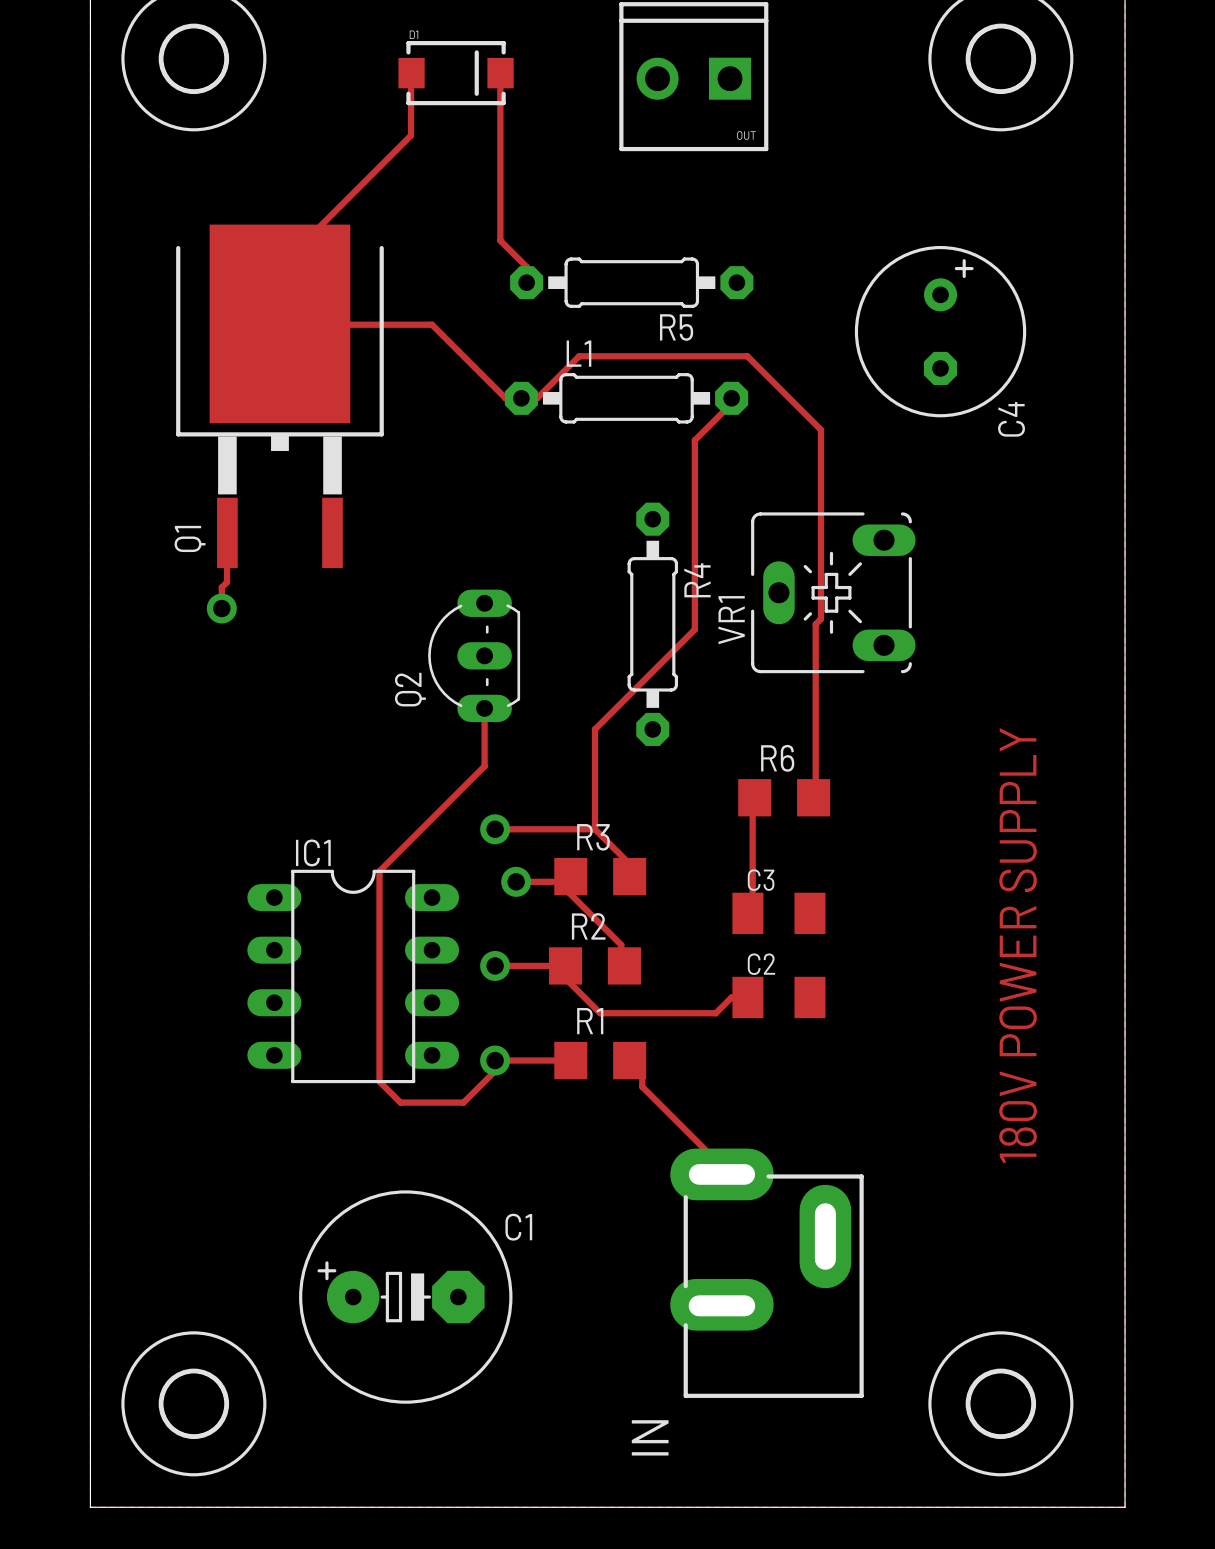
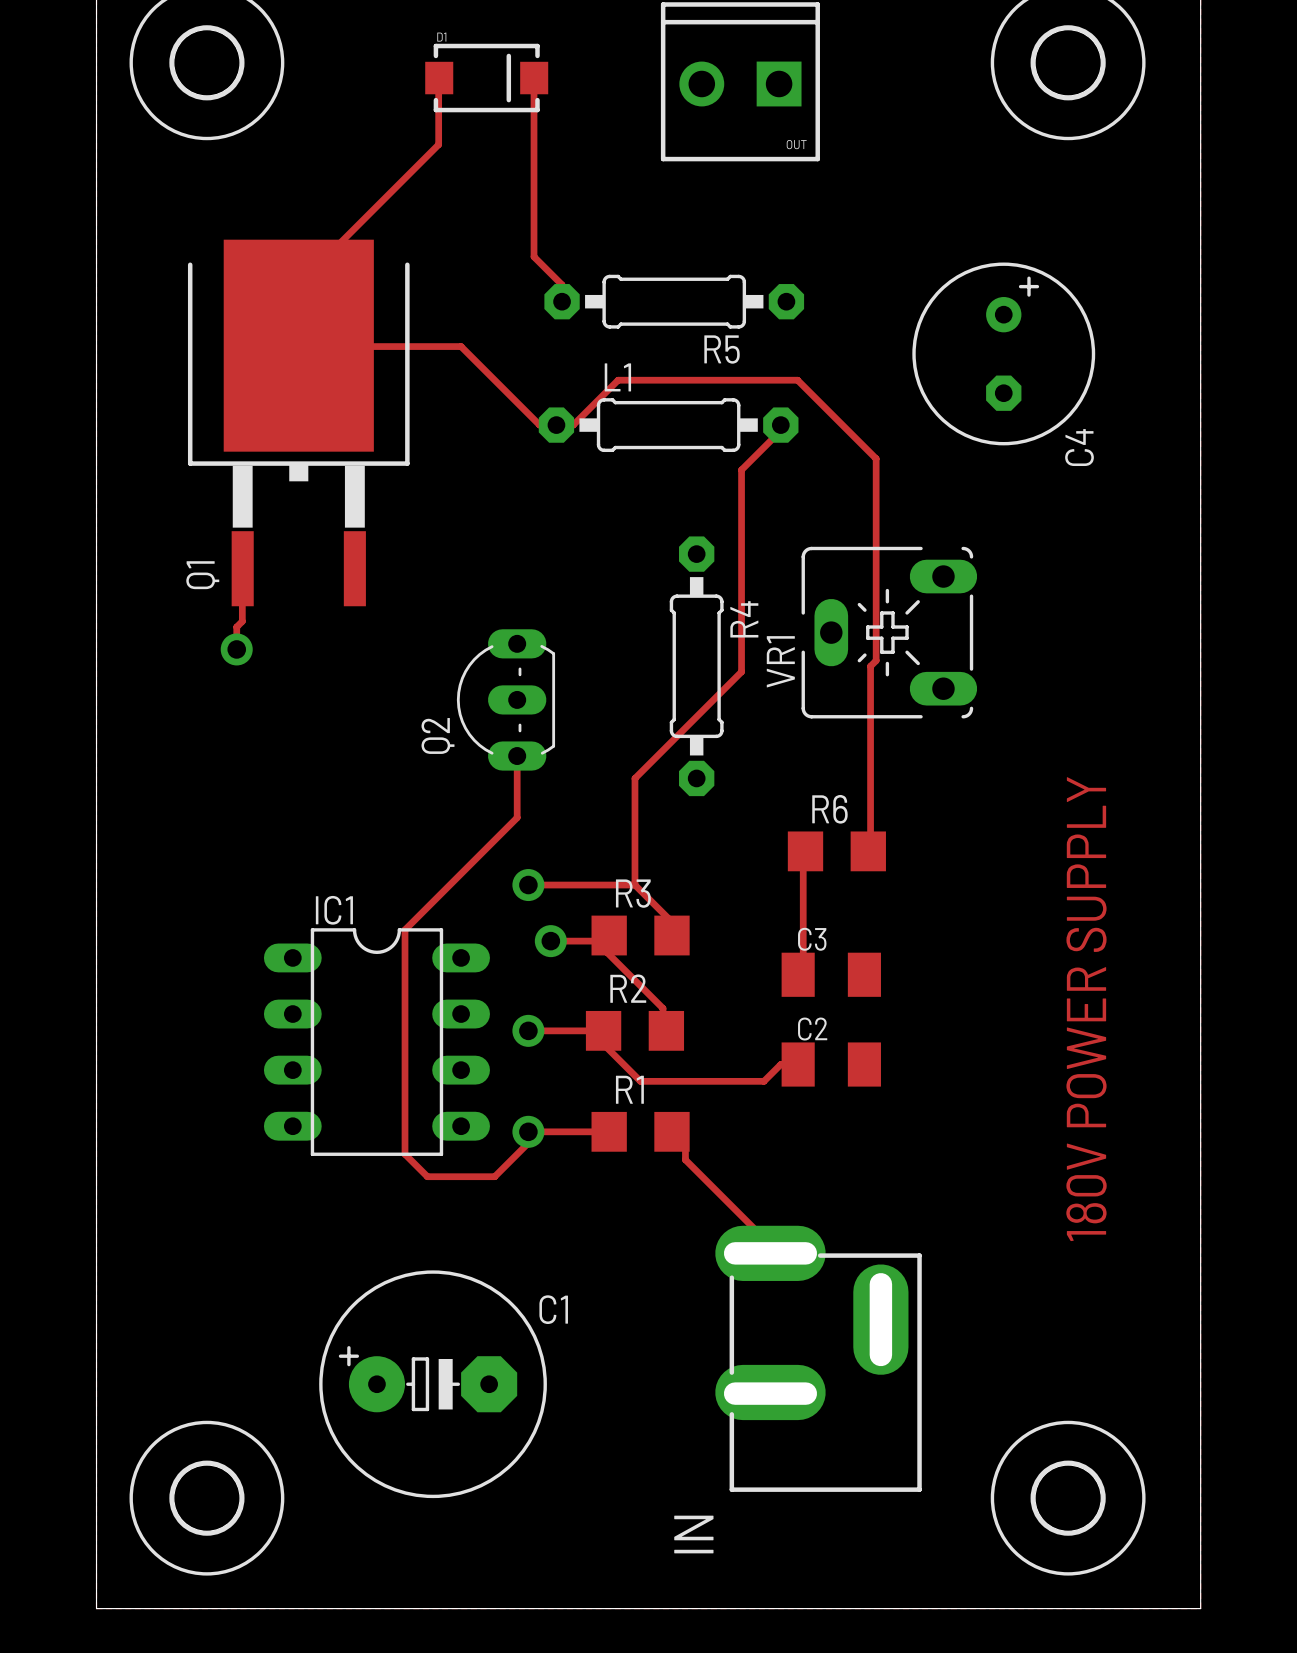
IN footprint: [670, 1148, 864, 1398] -> [715, 1225, 922, 1492]

